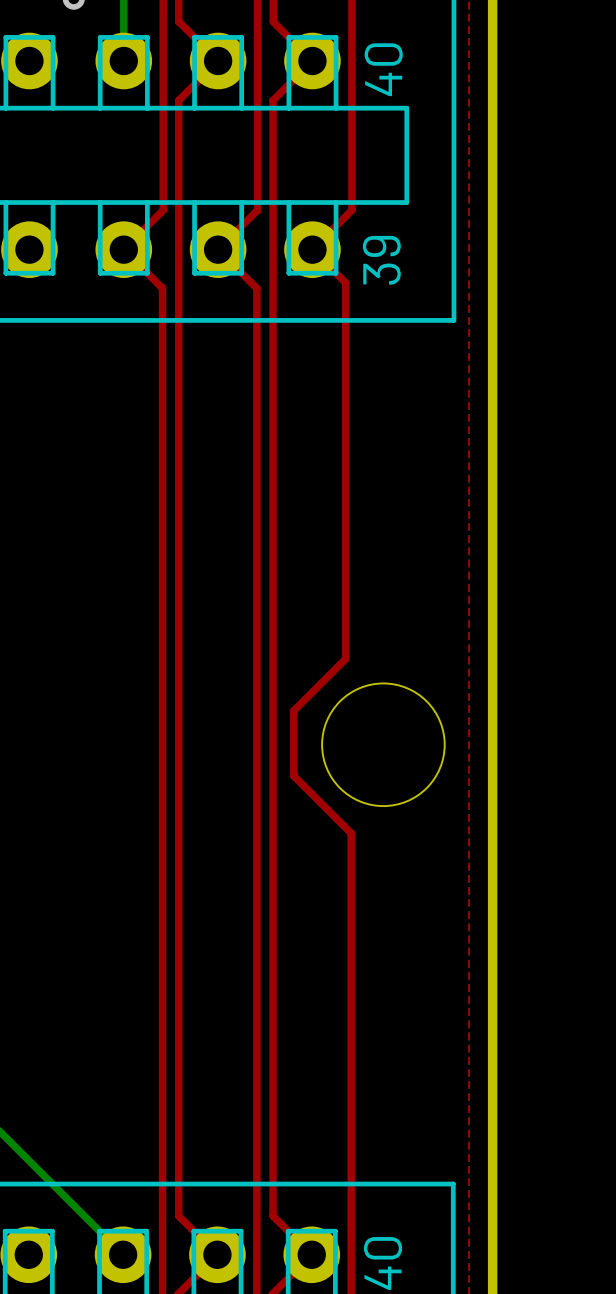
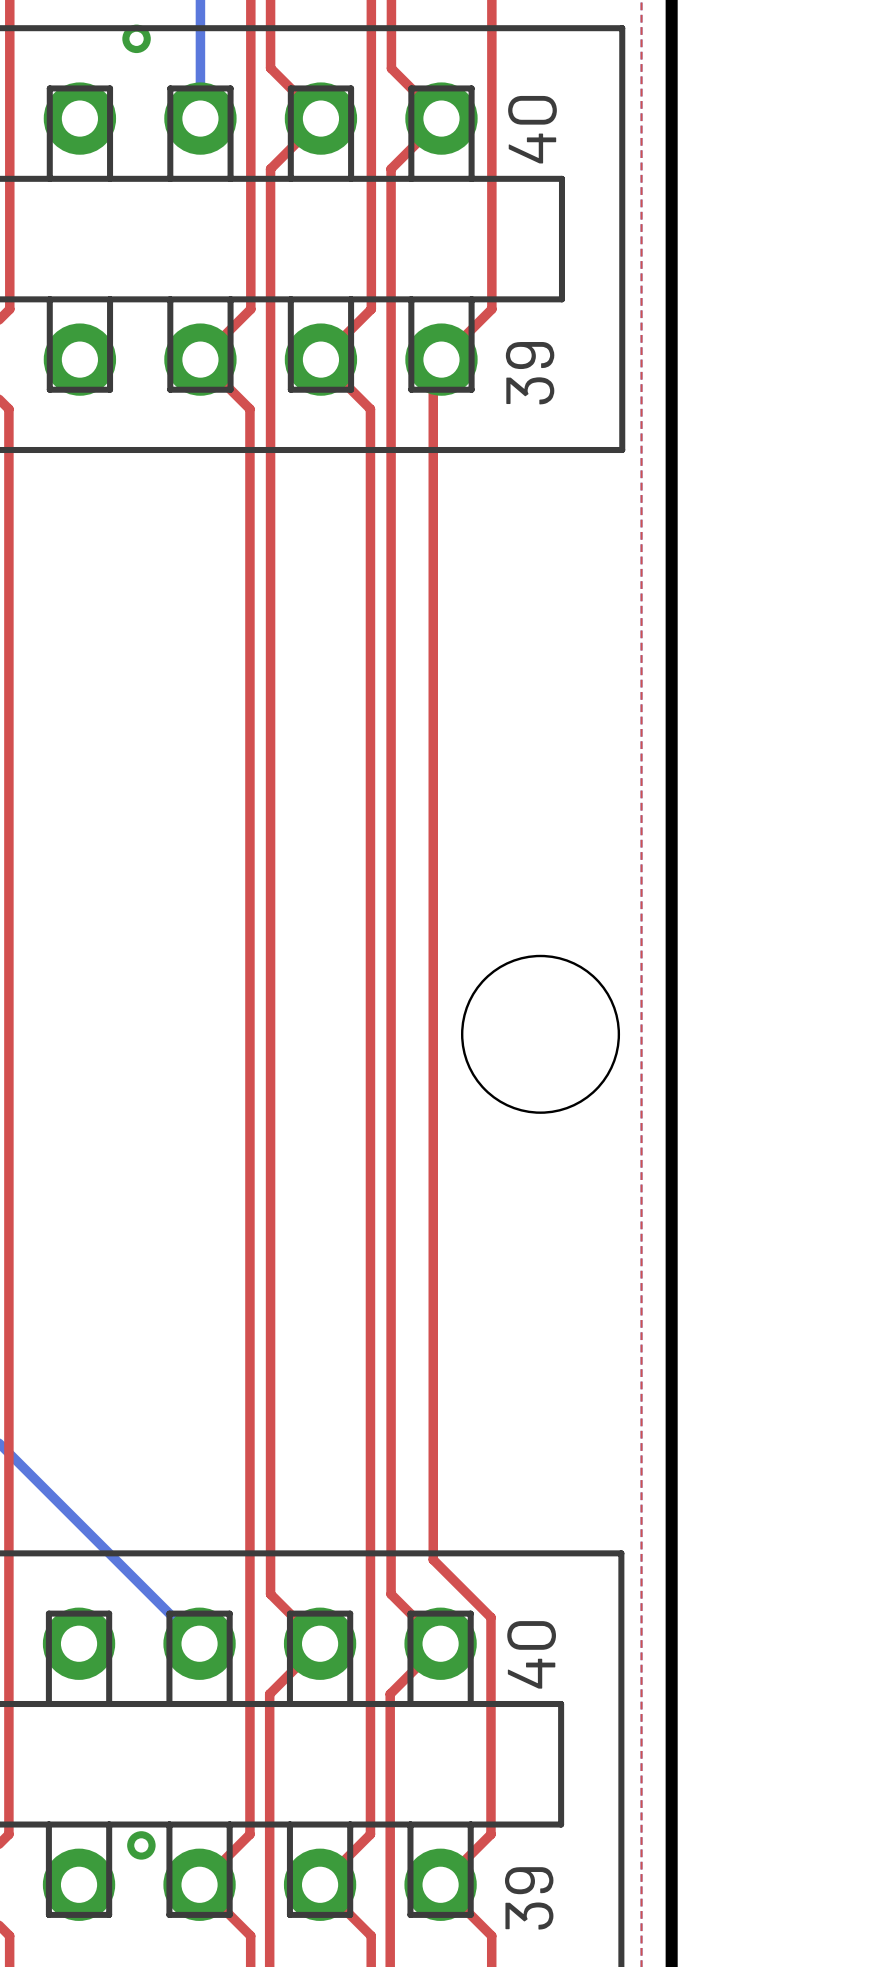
top track: (312, 249) (345, 282) (345, 658) (293, 710) (293, 775) (351, 833) (351, 1234) -> (441, 359) (433, 367) (433, 1559) (490, 1617)
round board edge position: (383, 744) -> (540, 1034)

